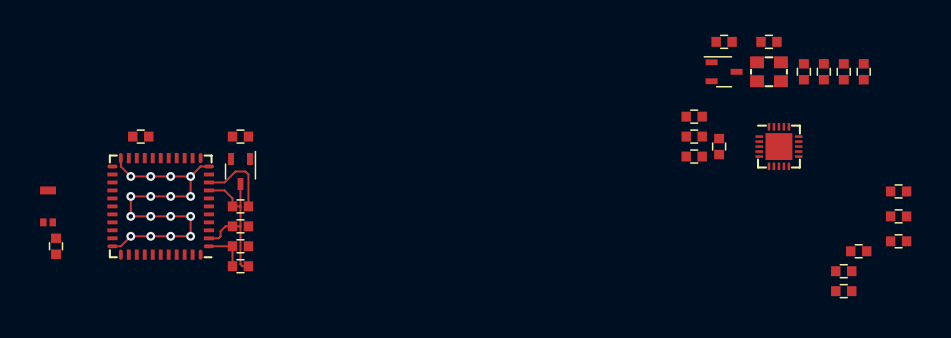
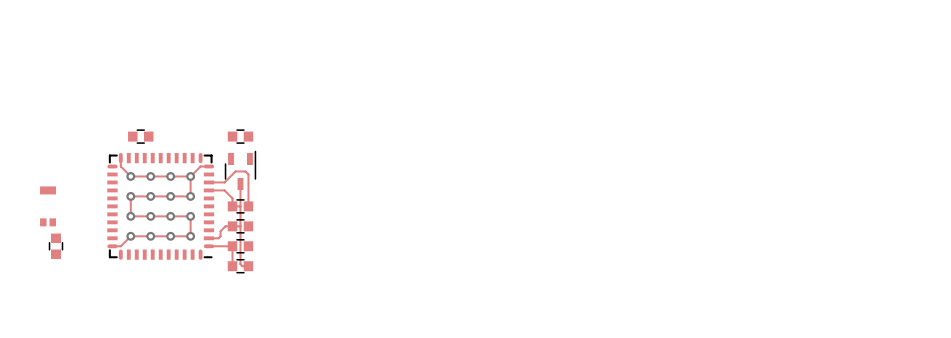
part: (724, 41) -> none
part: (768, 41) -> none
part: (723, 71) -> none
part: (768, 71) -> none
part: (803, 71) -> none
part: (823, 71) -> none
part: (843, 71) -> none
part: (863, 71) -> none
part: (694, 116) -> none
part: (694, 136) -> none
part: (719, 146) -> none
part: (778, 146) -> none
part: (694, 156) -> none
part: (898, 191) -> none
part: (898, 216) -> none
part: (898, 241) -> none
part: (858, 251) -> none
part: (843, 271) -> none
part: (843, 291) -> none

